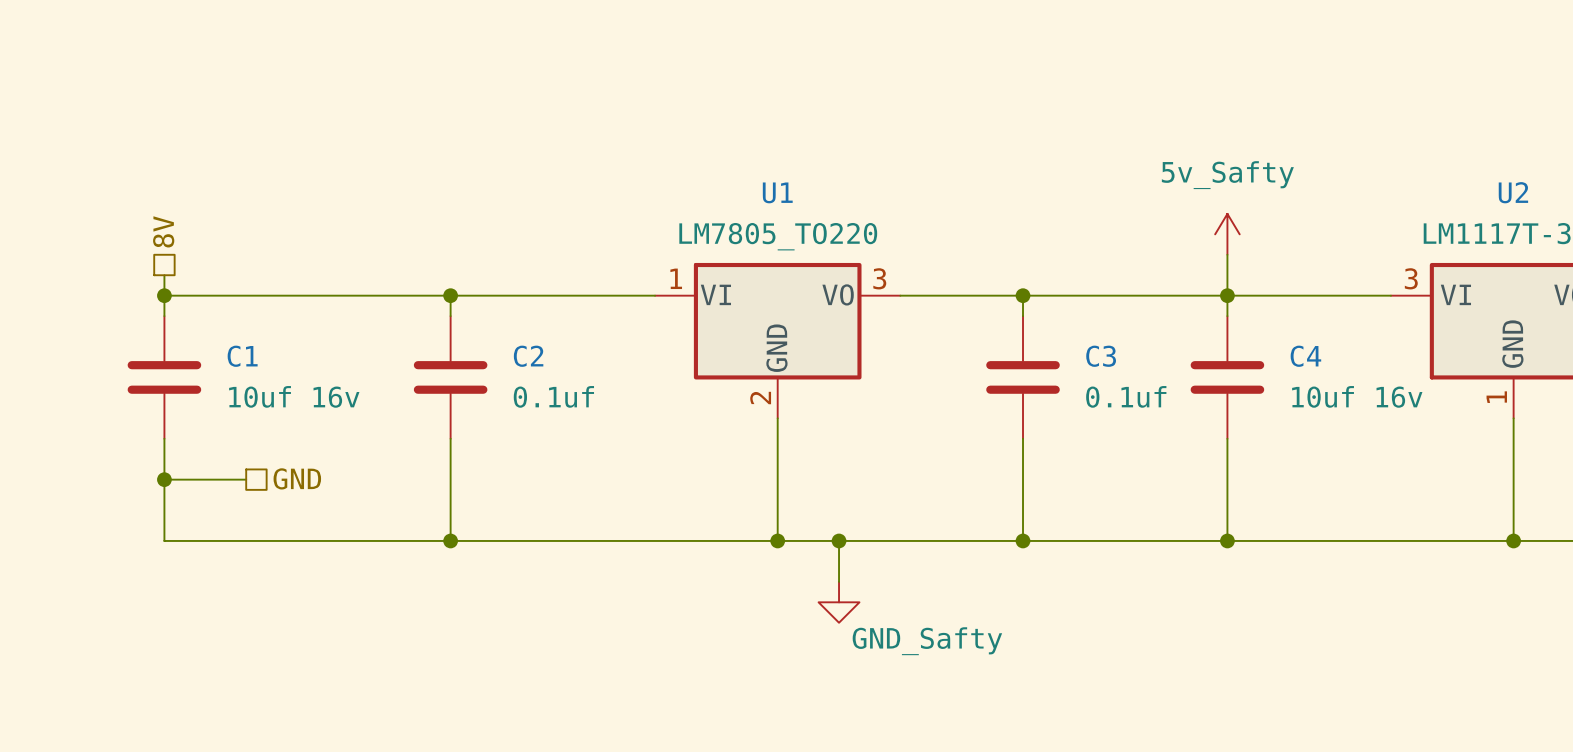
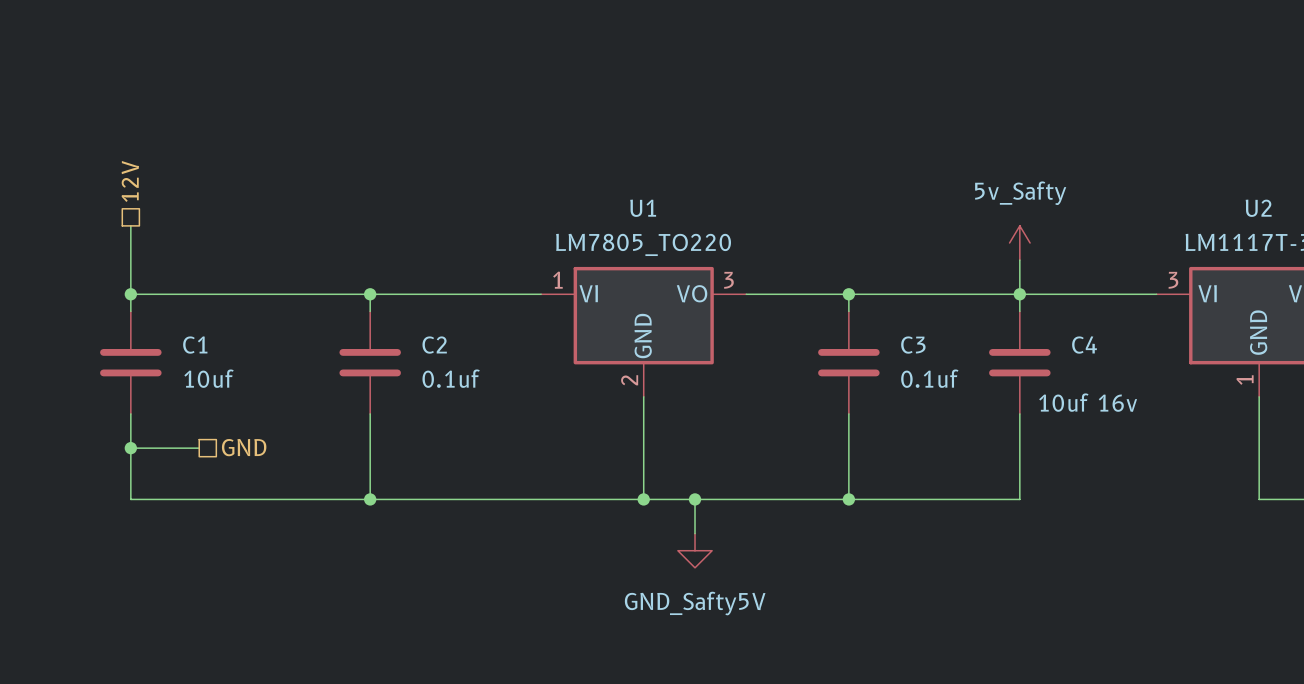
hierarchical label: none -> 12V (130, 181)
wire: none -> (130, 225) (130, 277)
hierarchical label: 8V (163, 231) -> none
C1 value: 10uf 16v (294, 396) -> 10uf (209, 378)
C4 value position: 10uf 16v (1357, 396) -> 10uf 16v (1088, 402)
wire: (1227, 540) (1513, 540) -> none
junction: (1227, 540) -> none
junction: (1513, 540) -> none
power symbol: GND_Safty (839, 602) -> GND_Safty5V (695, 550)

